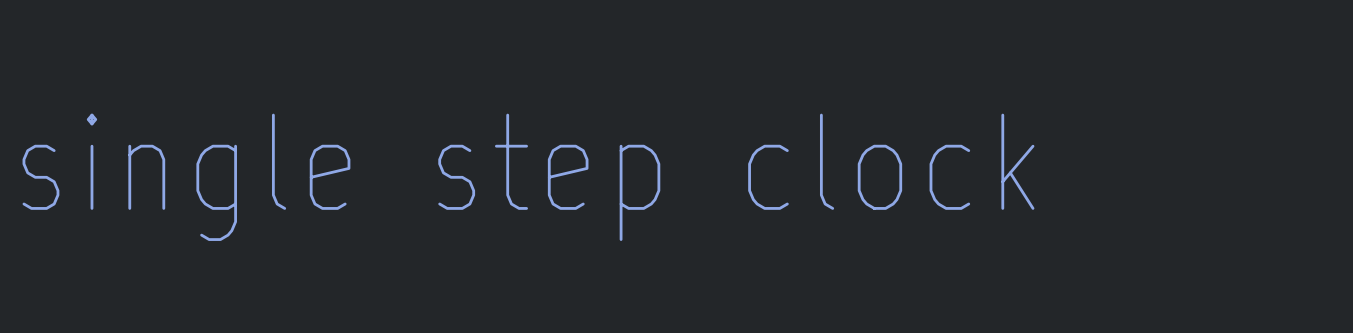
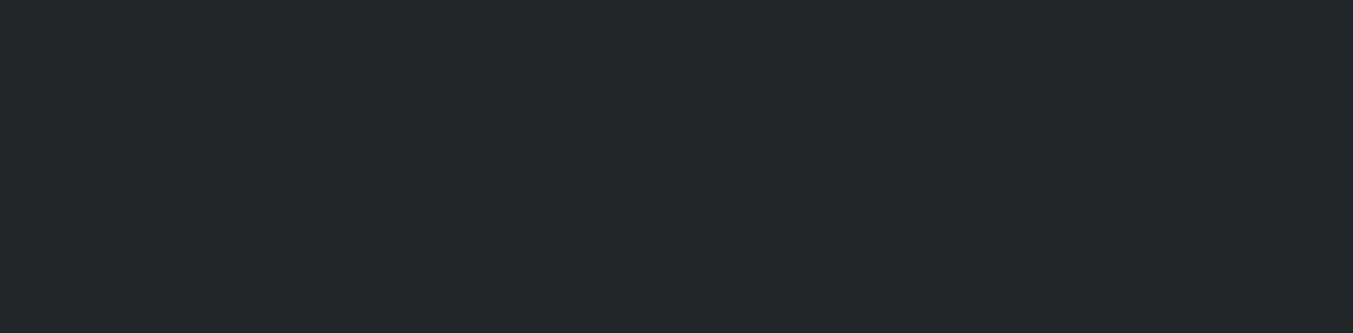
text: single step clock (528, 177) -> none

